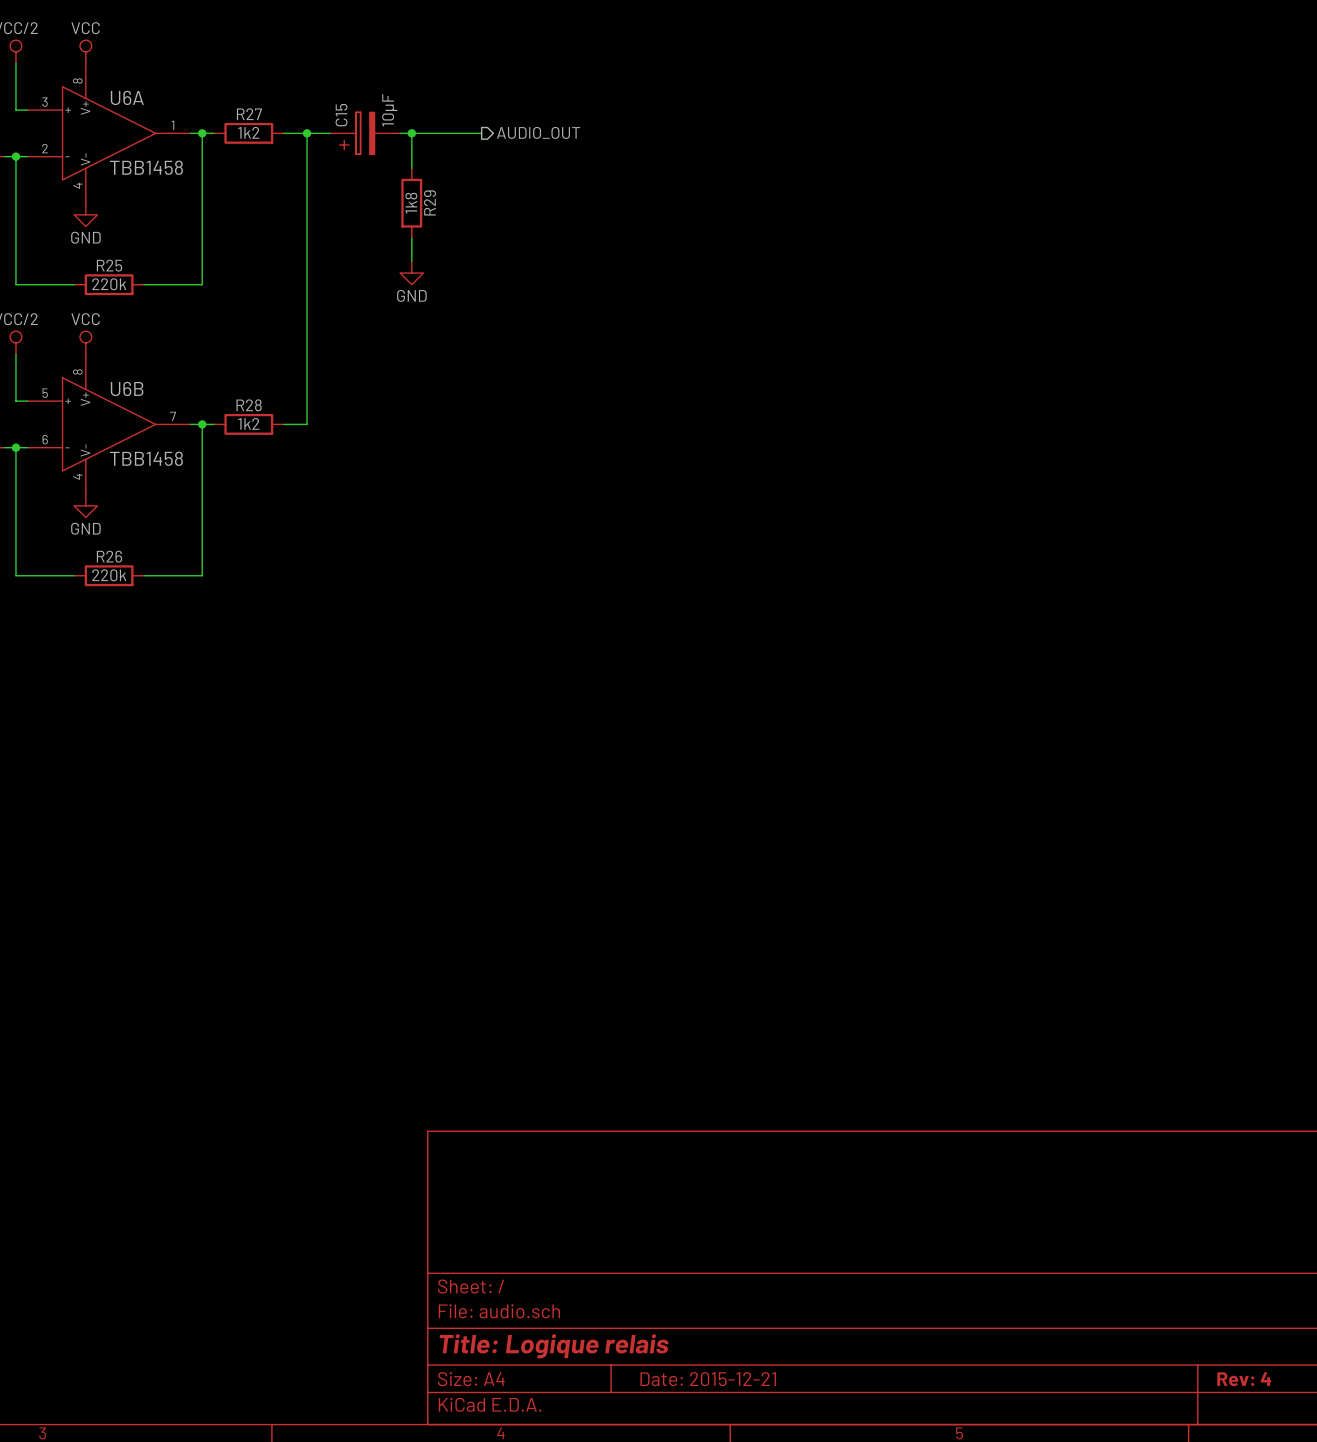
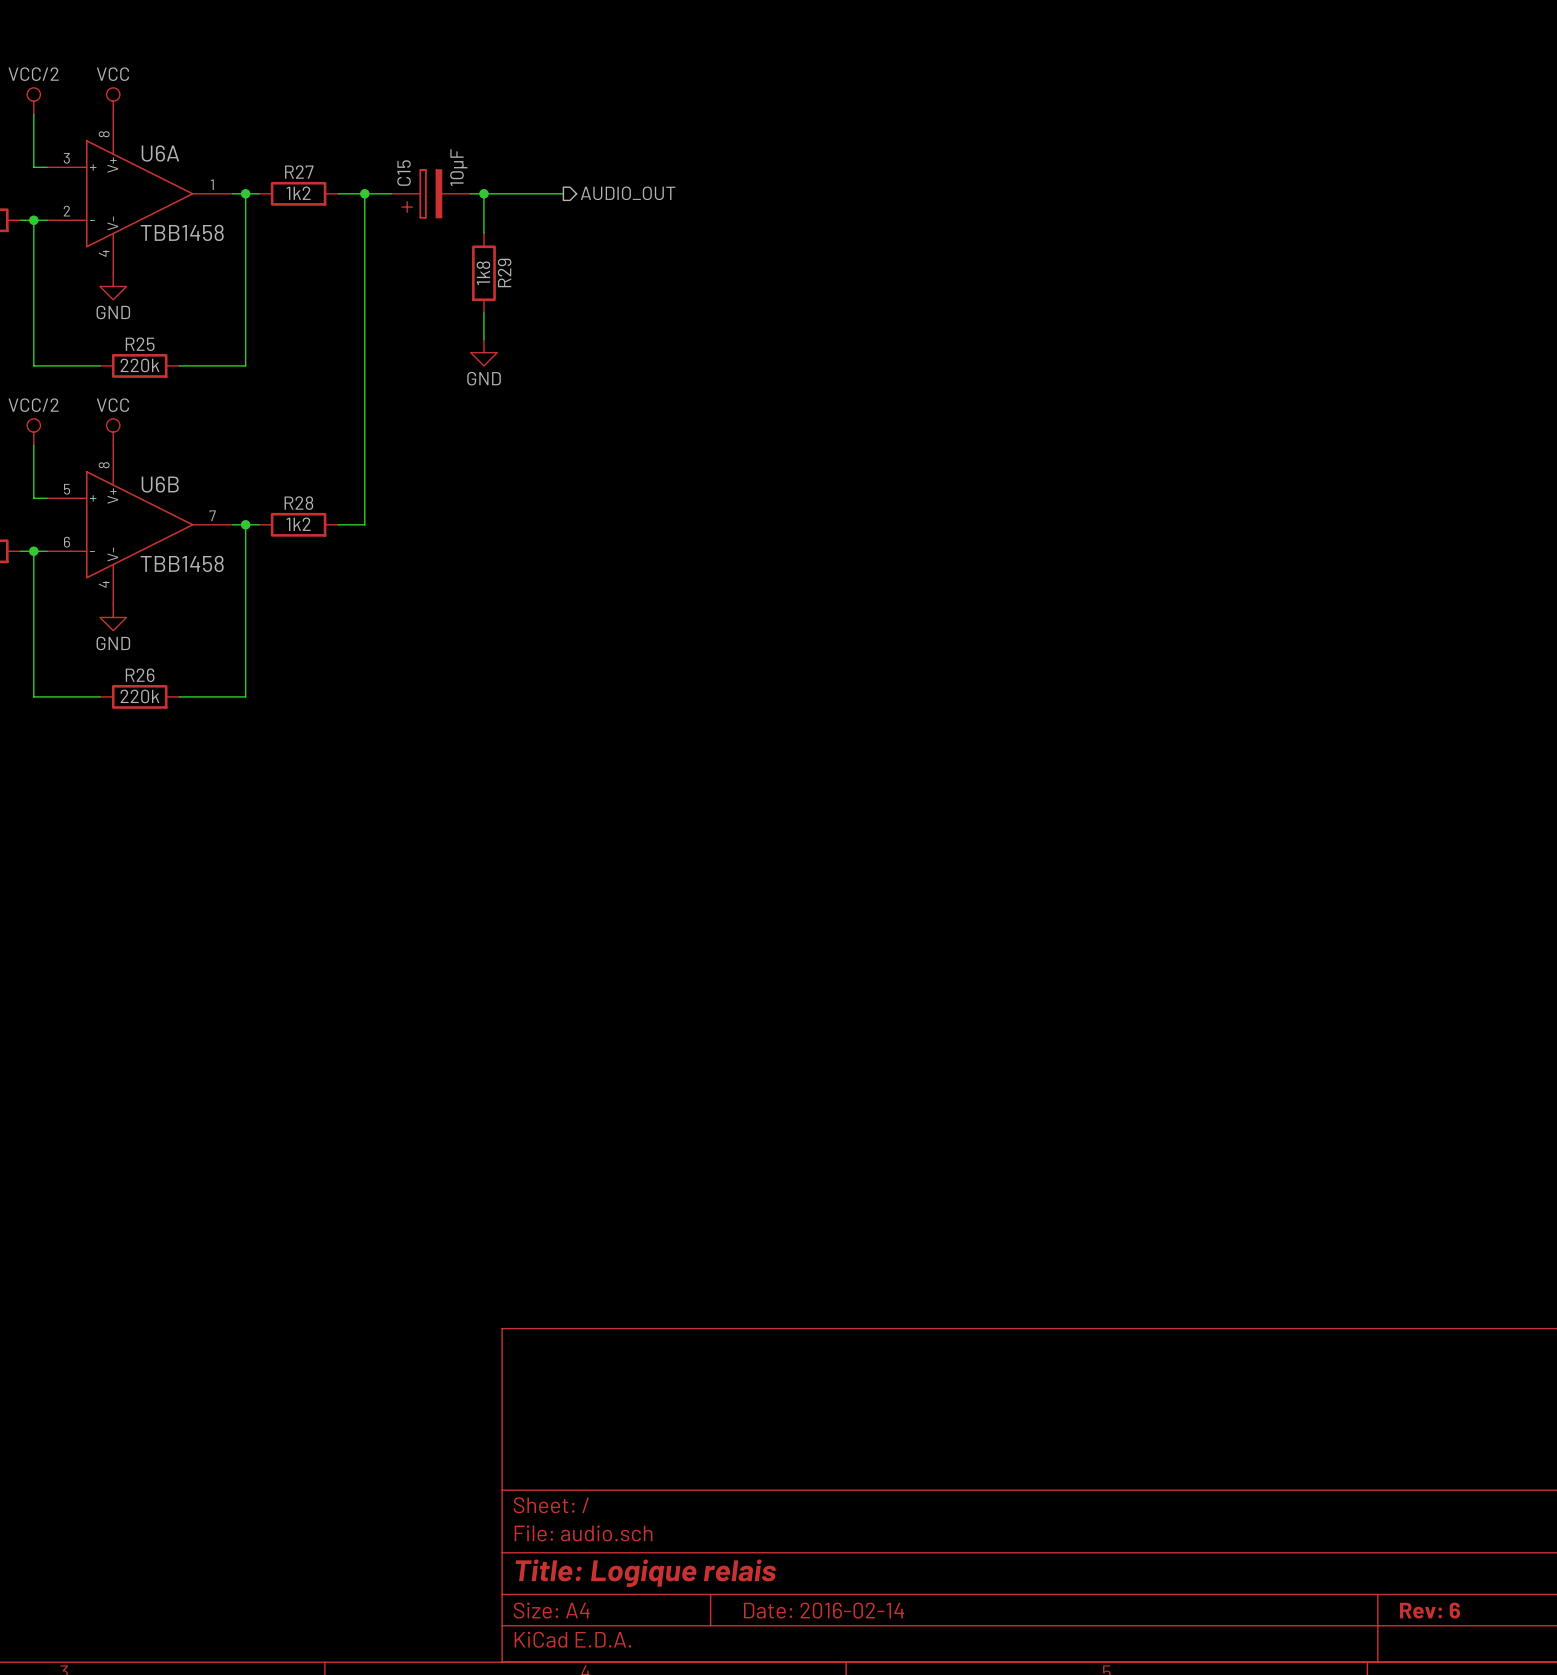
title block: Date: 2015-12-21 (708, 1379) -> Date: 2016-02-14 (824, 1610)
title block: Rev: 4 (1244, 1379) -> Rev: 6 (1430, 1610)

